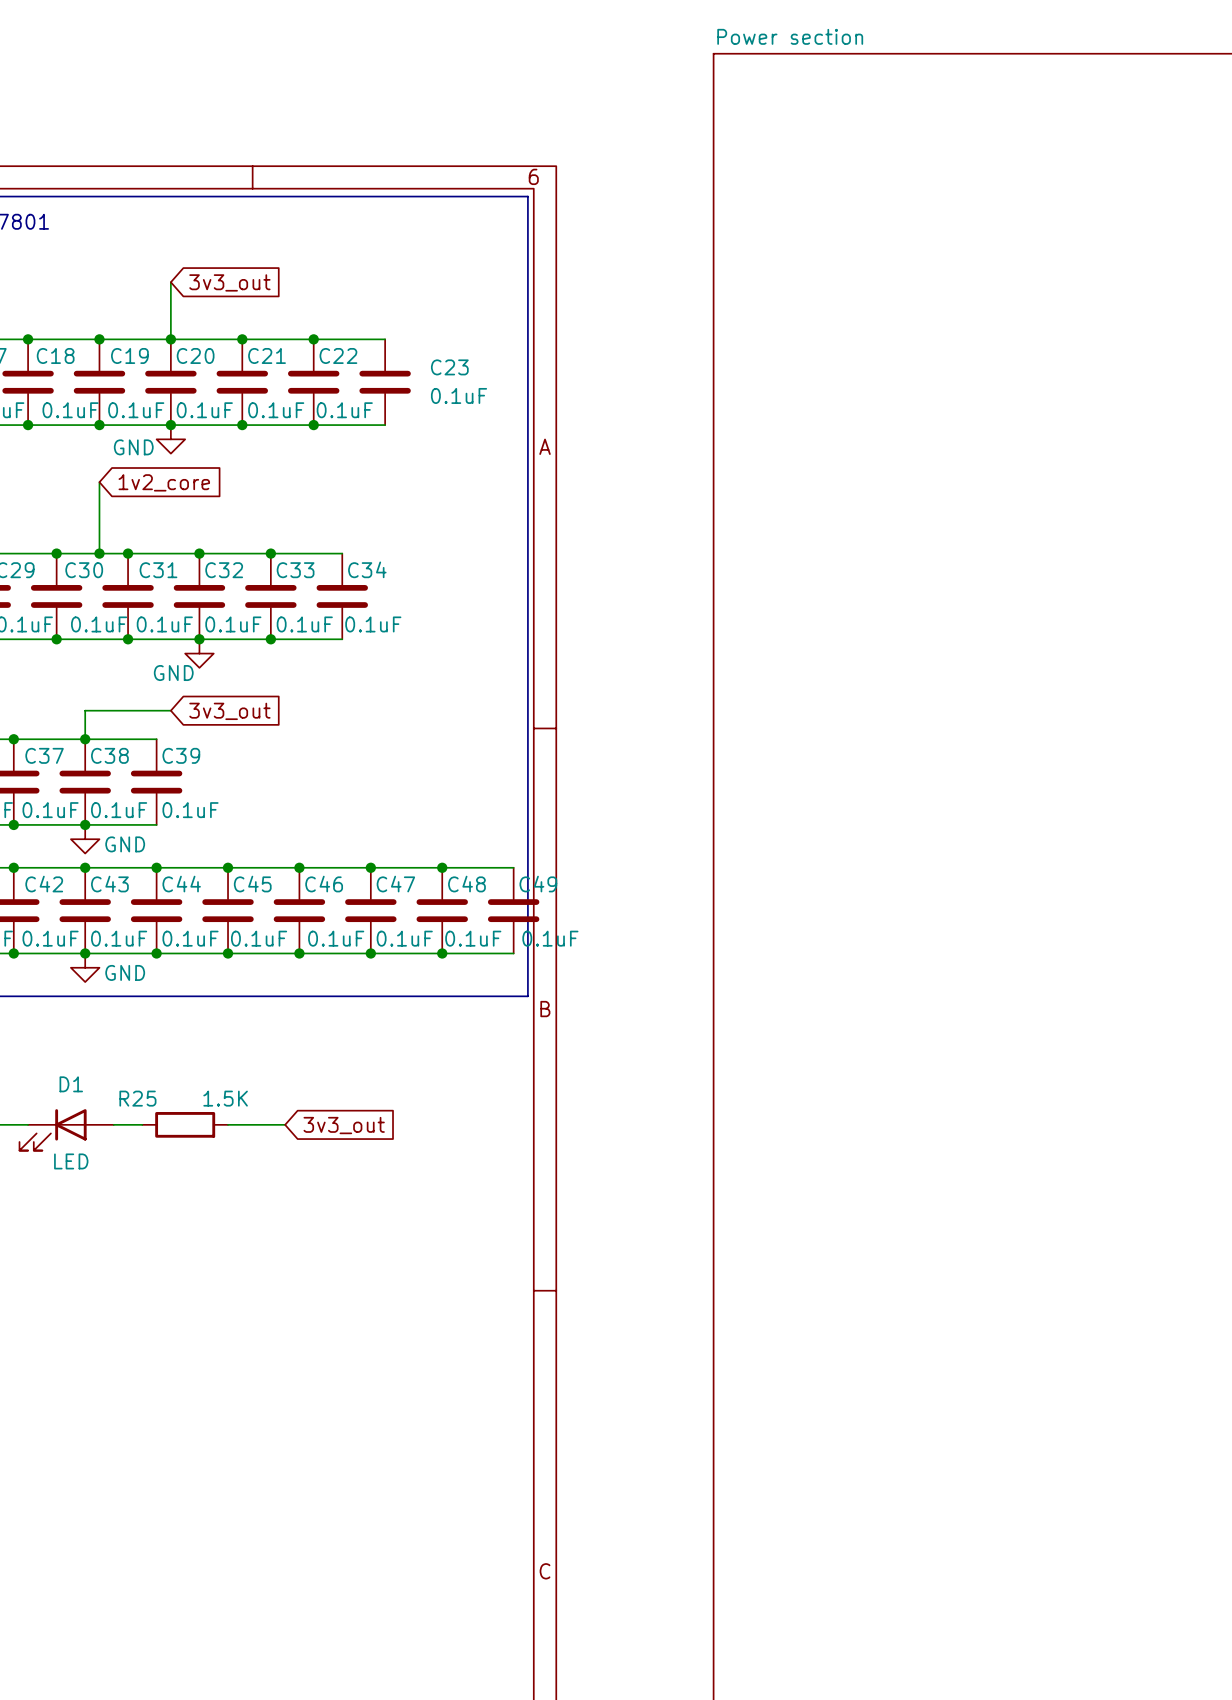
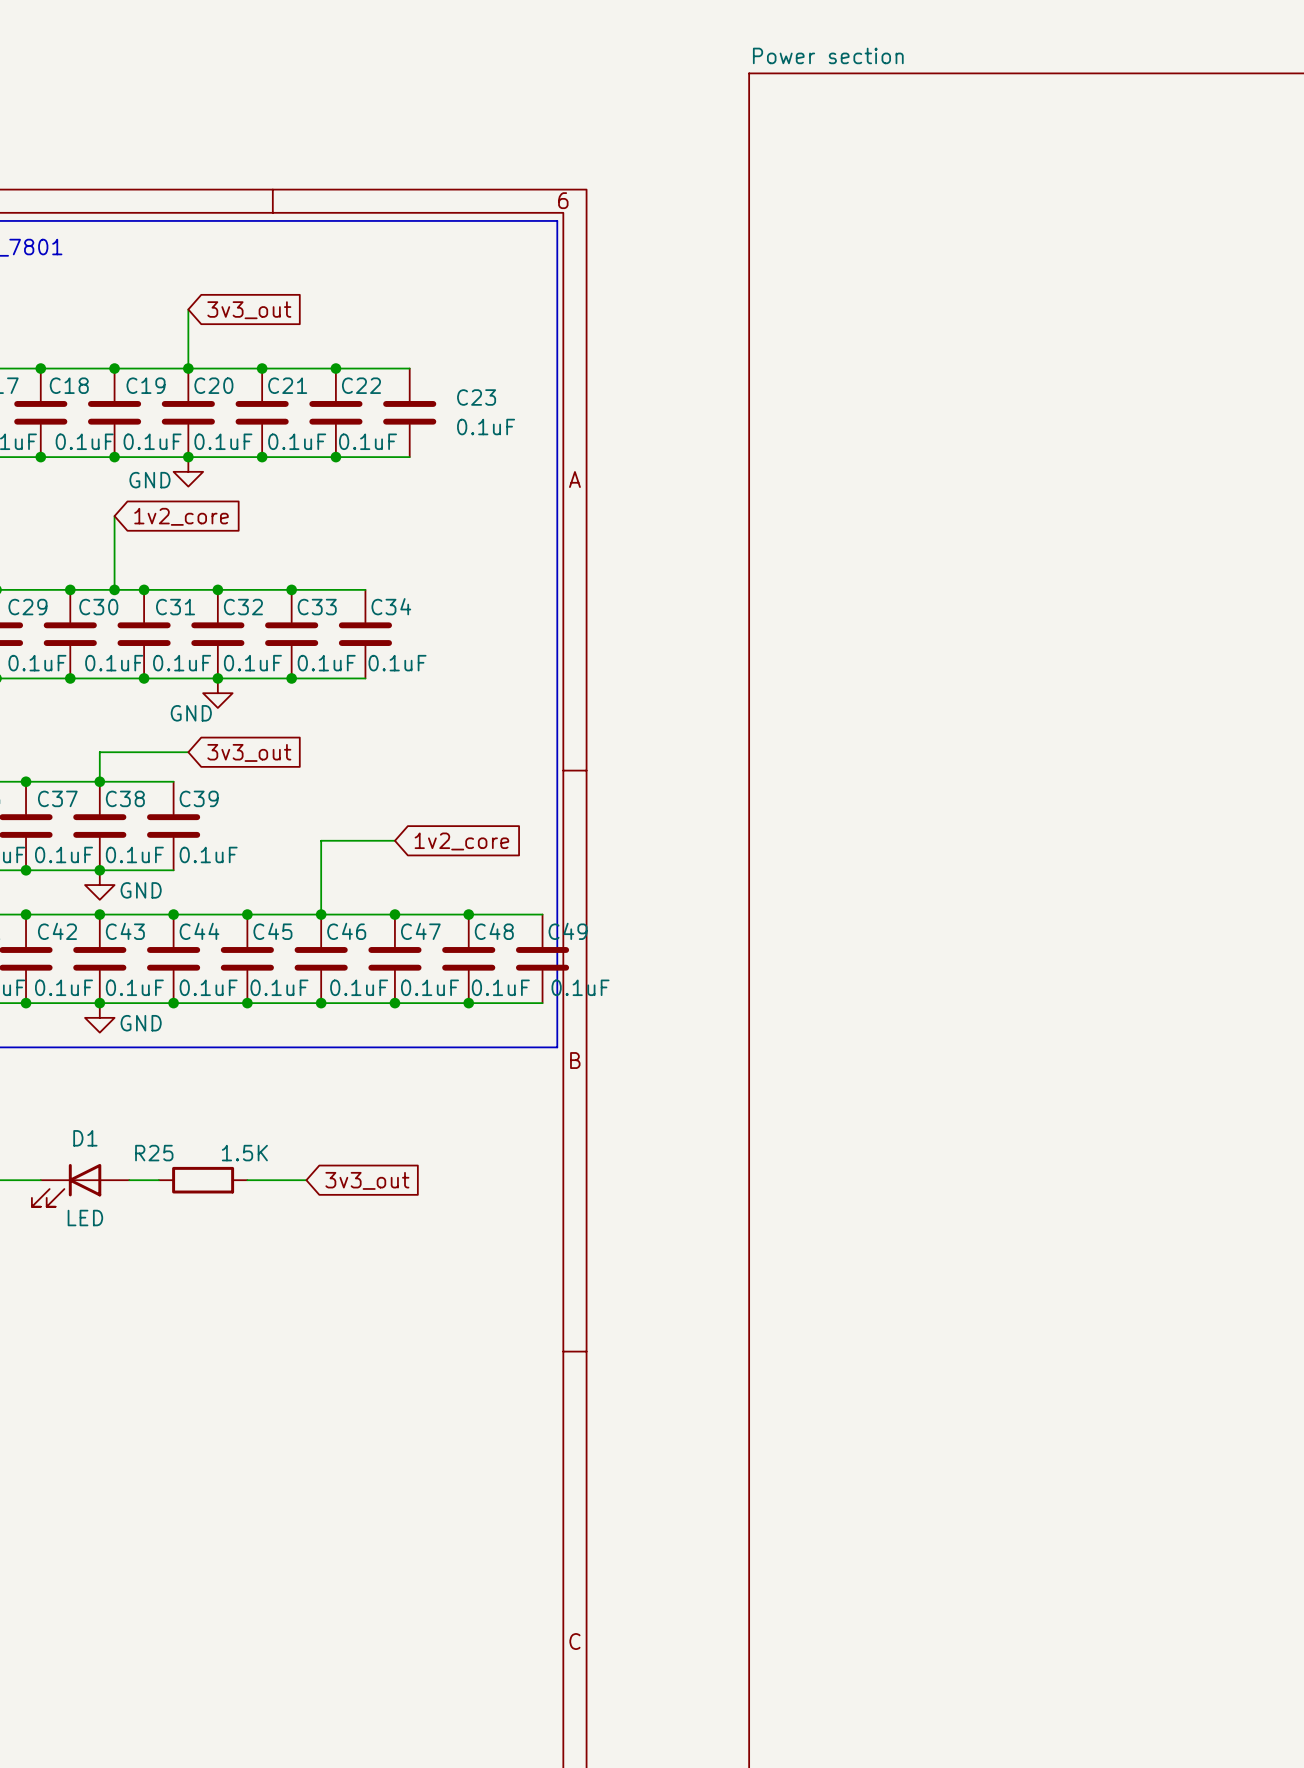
wire: none -> (394, 840) (321, 840) (321, 914)
global label: none -> 1v2_core (461, 841)

